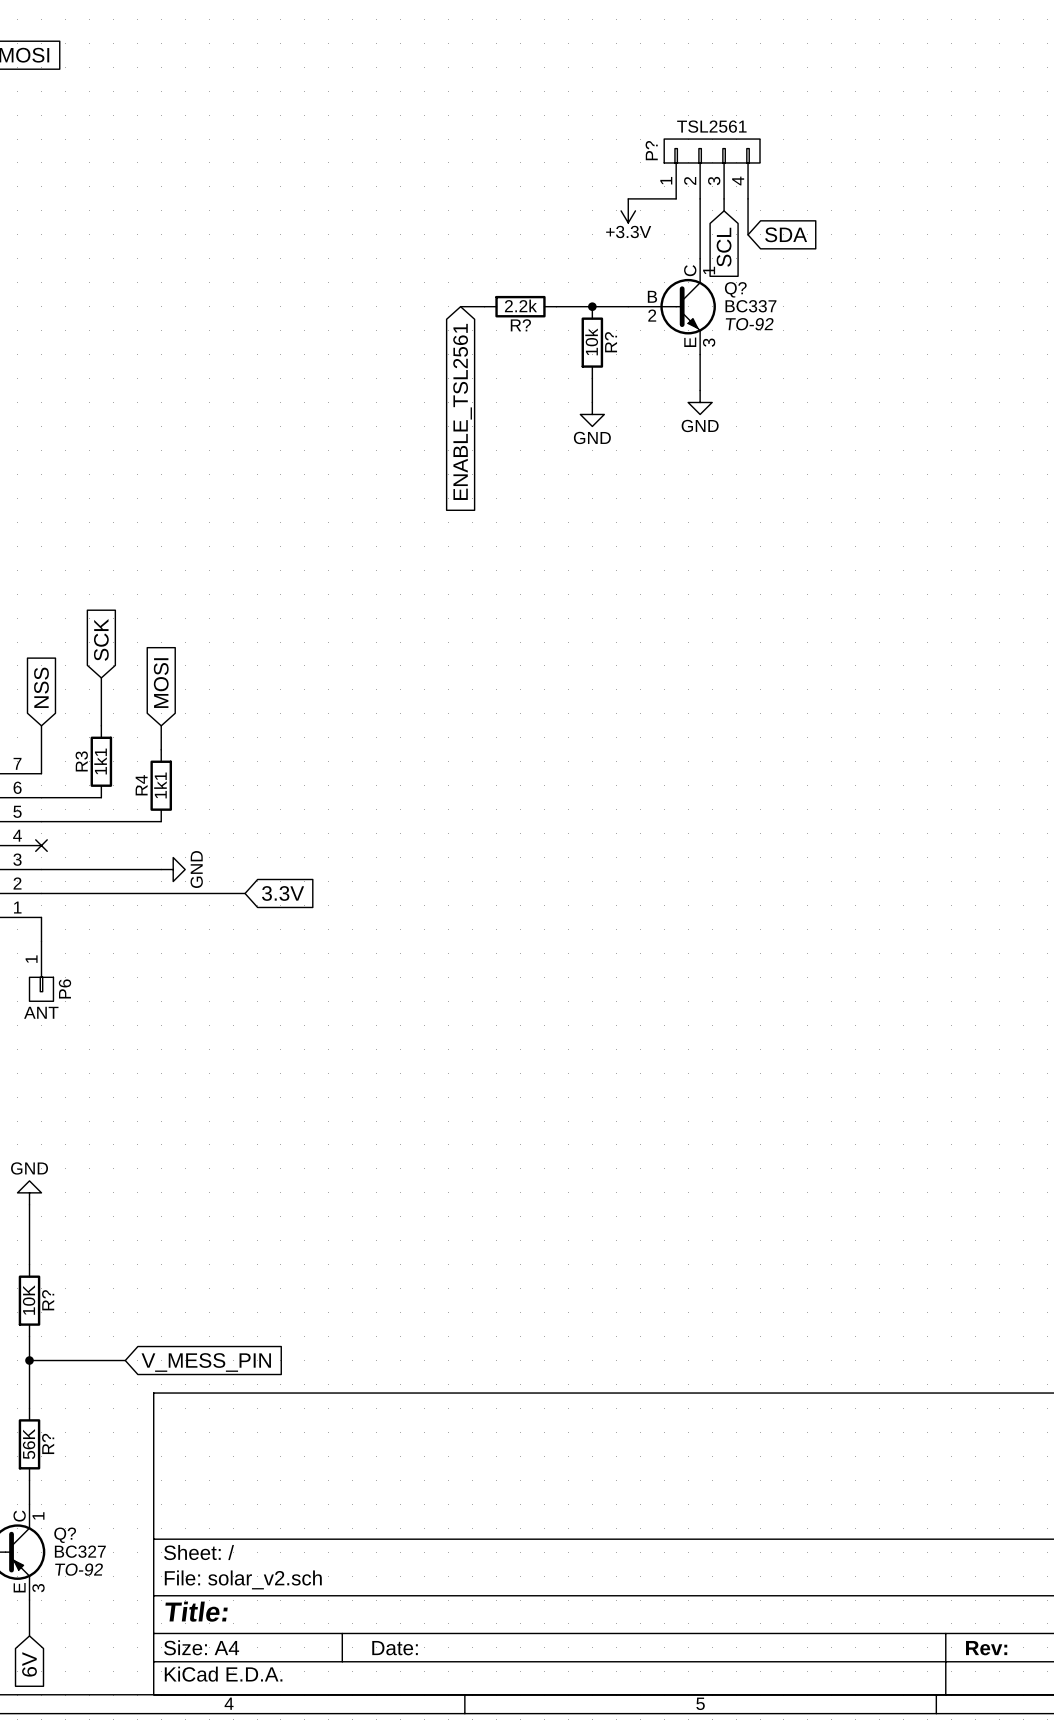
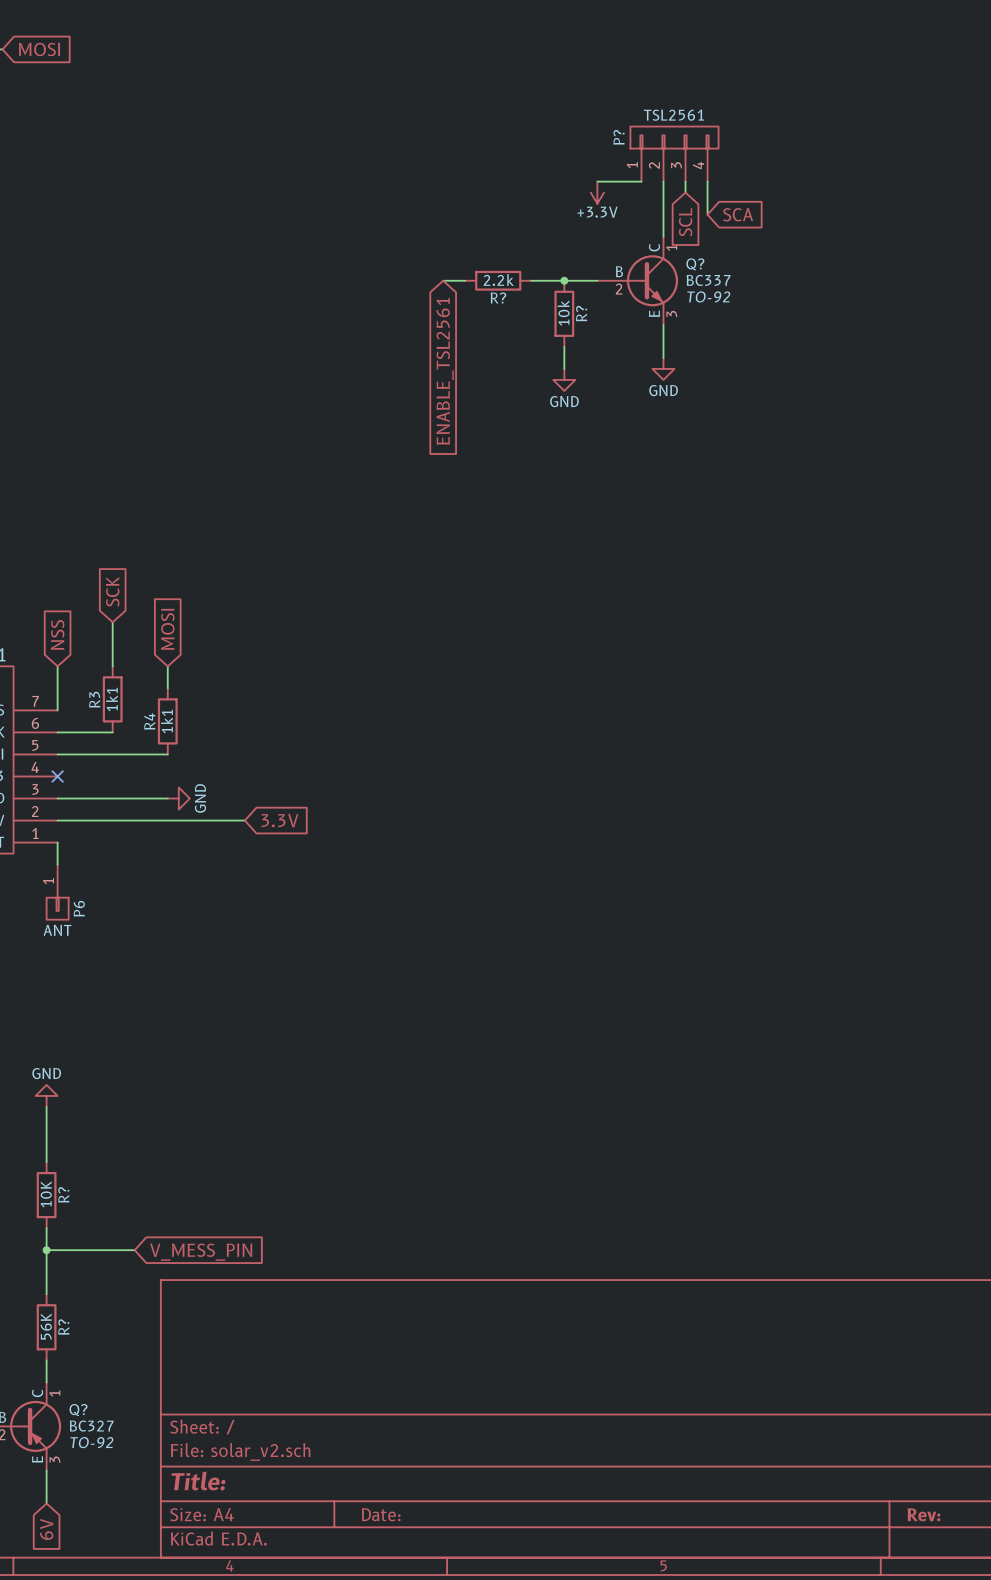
global label: SDA (786, 234) -> SCA (738, 214)

